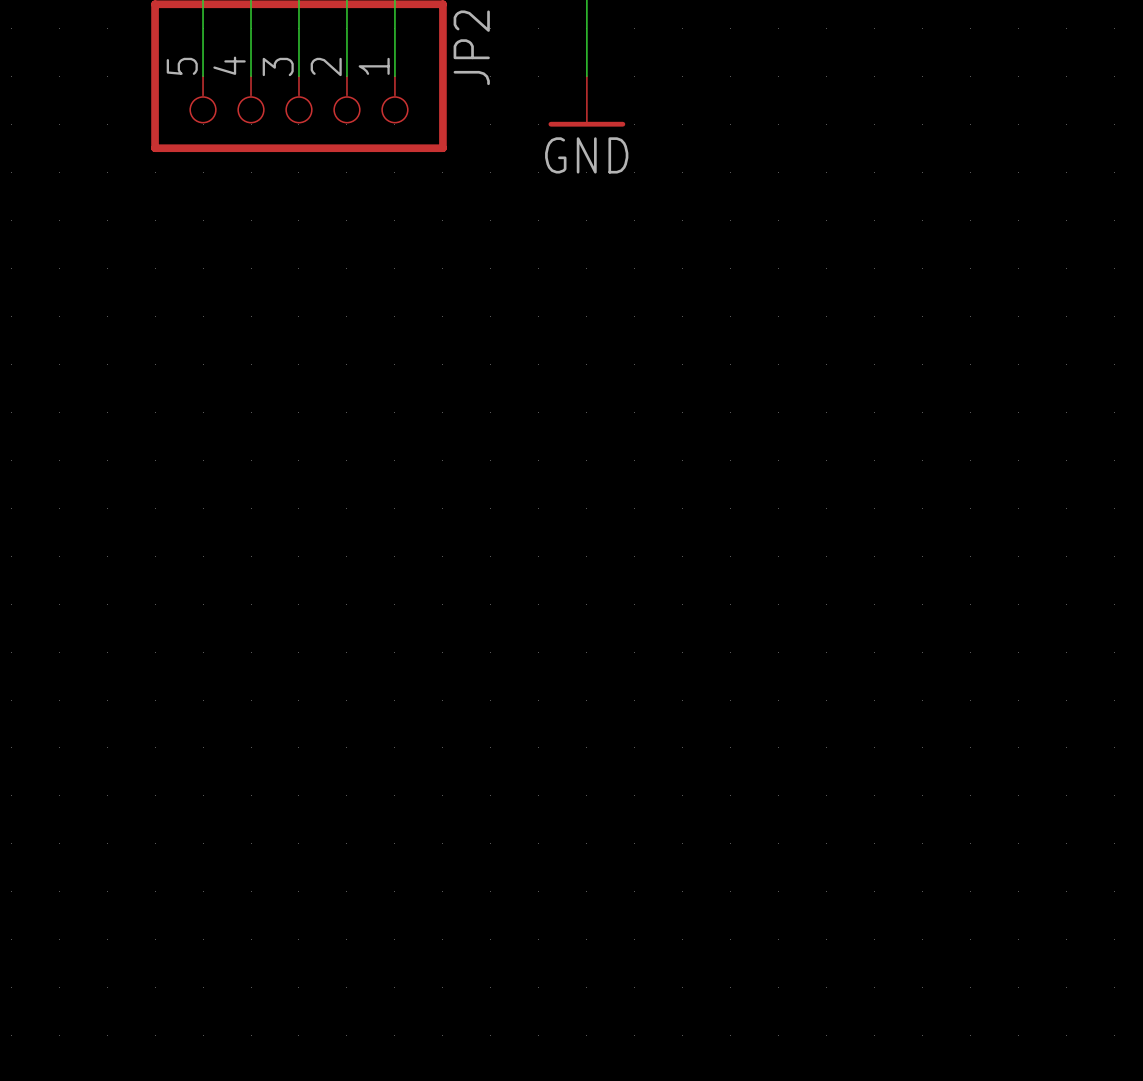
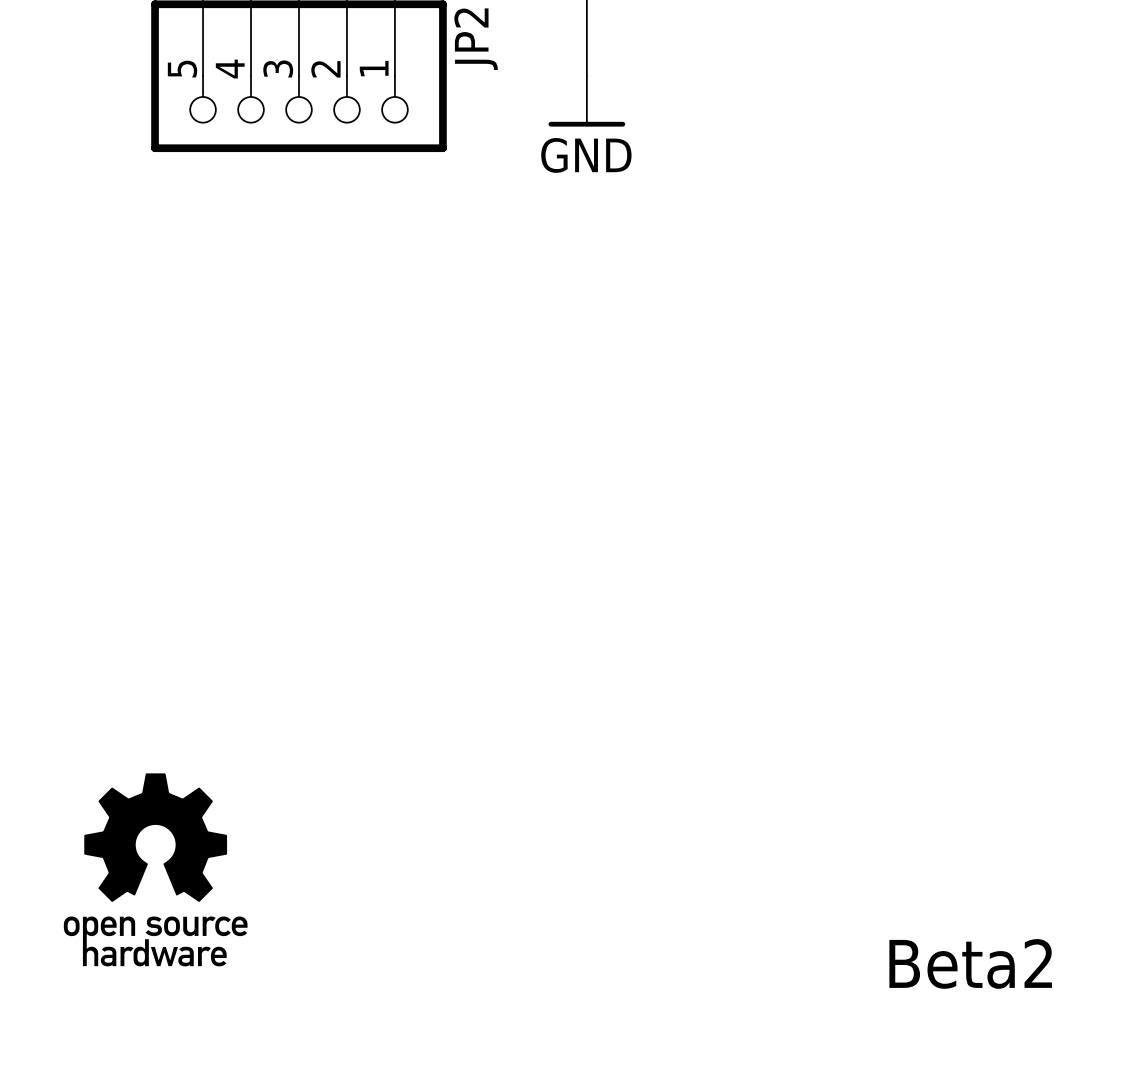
part: none -> (155, 869)
text: none -> Beta2 (970, 963)

